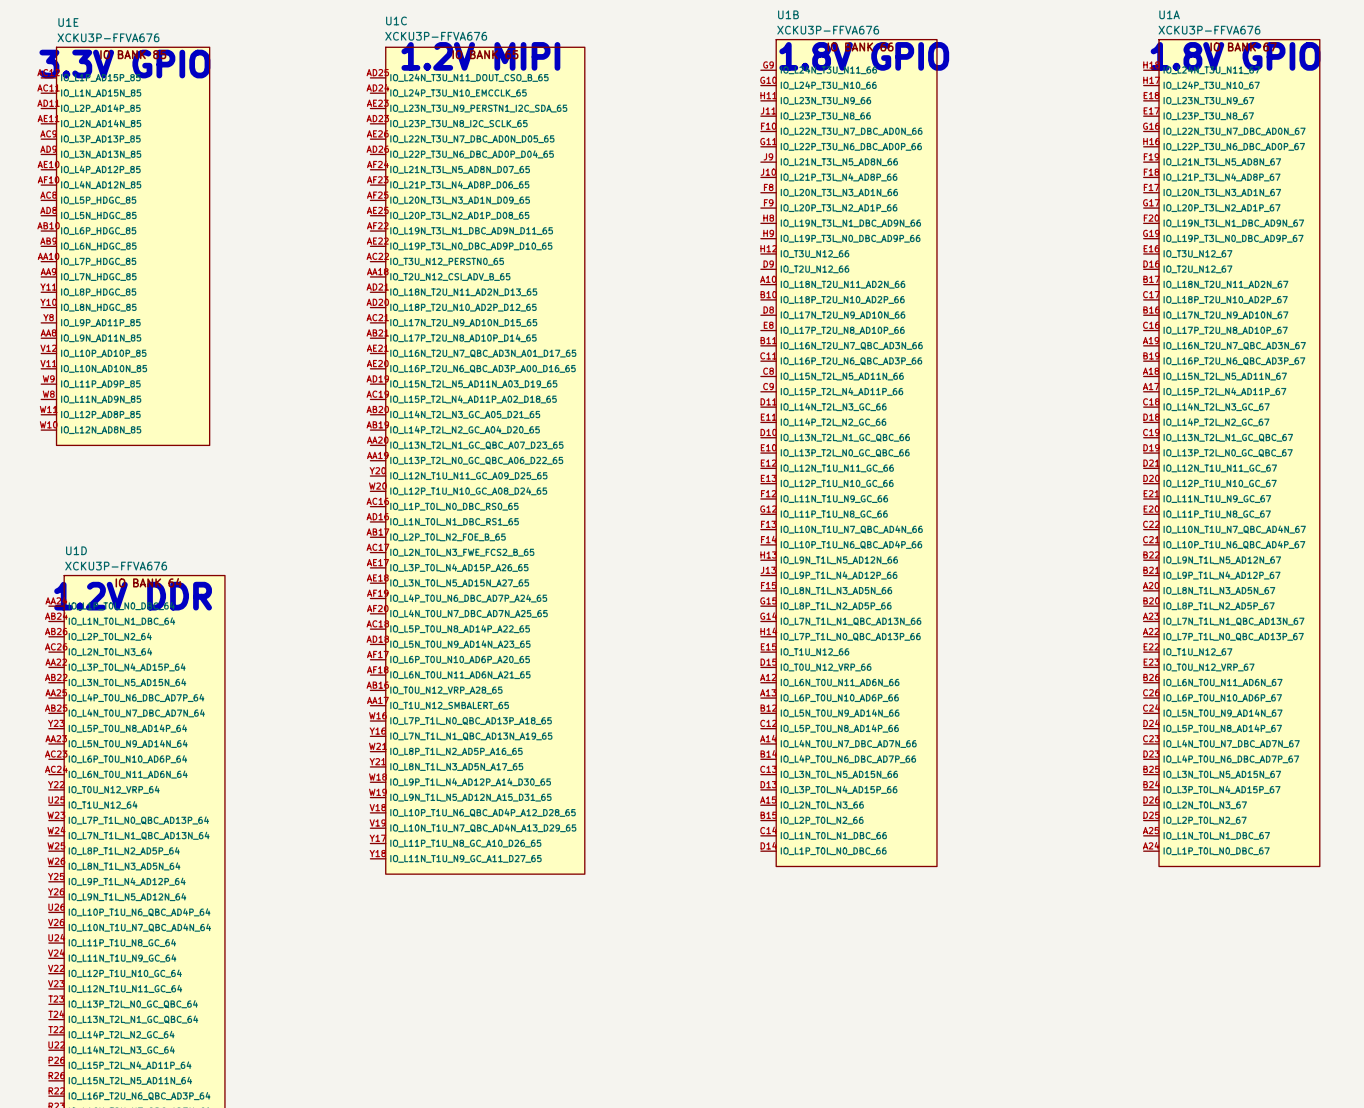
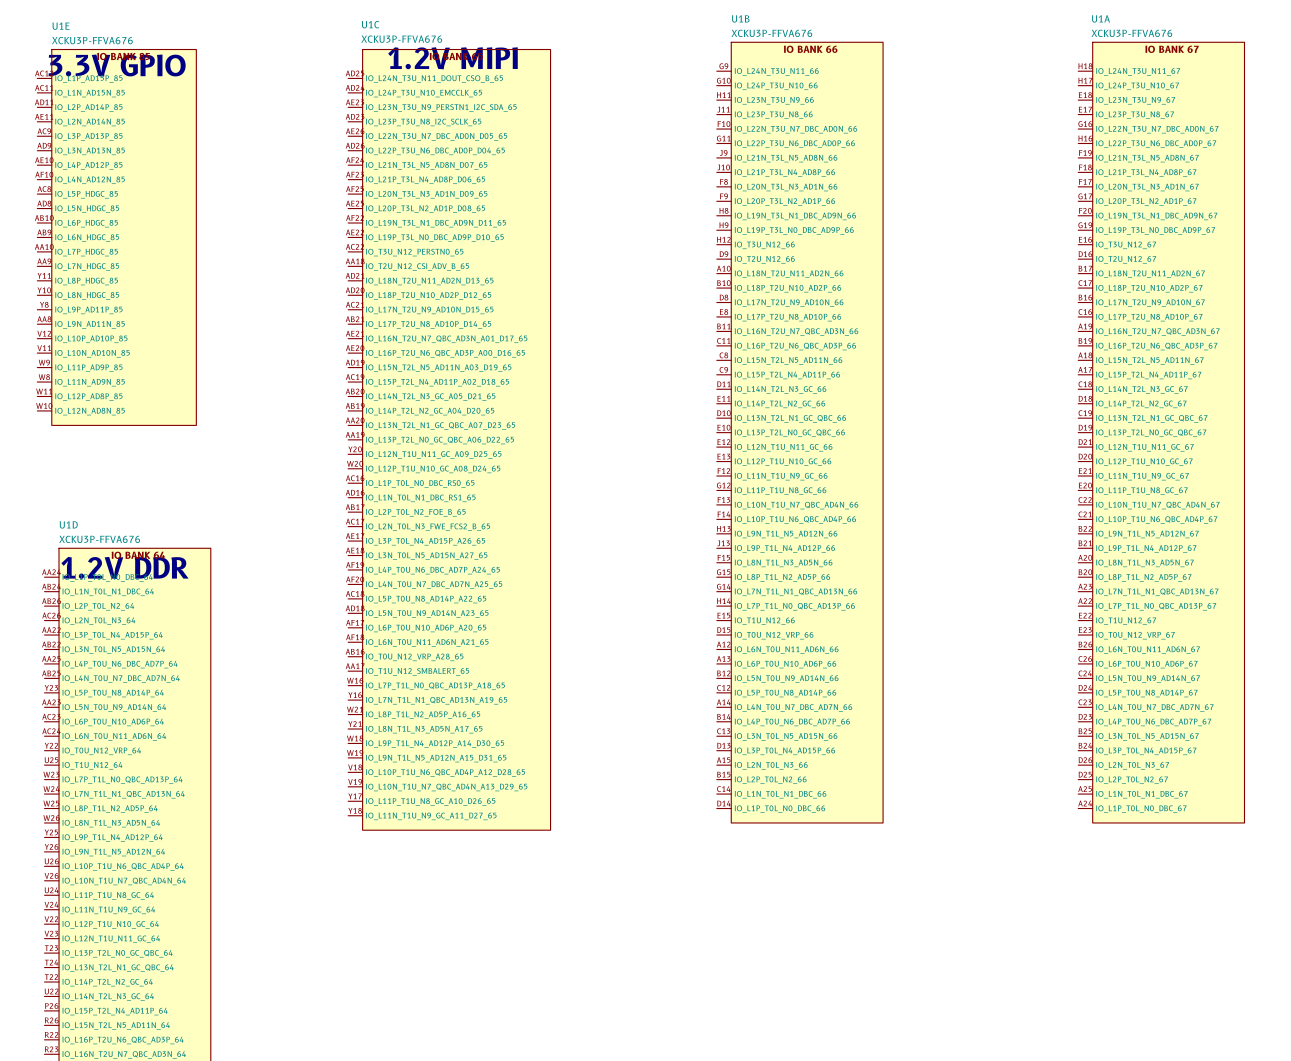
text: 1.8V GPIO (864, 56) -> none
text: 1.8V GPIO (1235, 56) -> none

